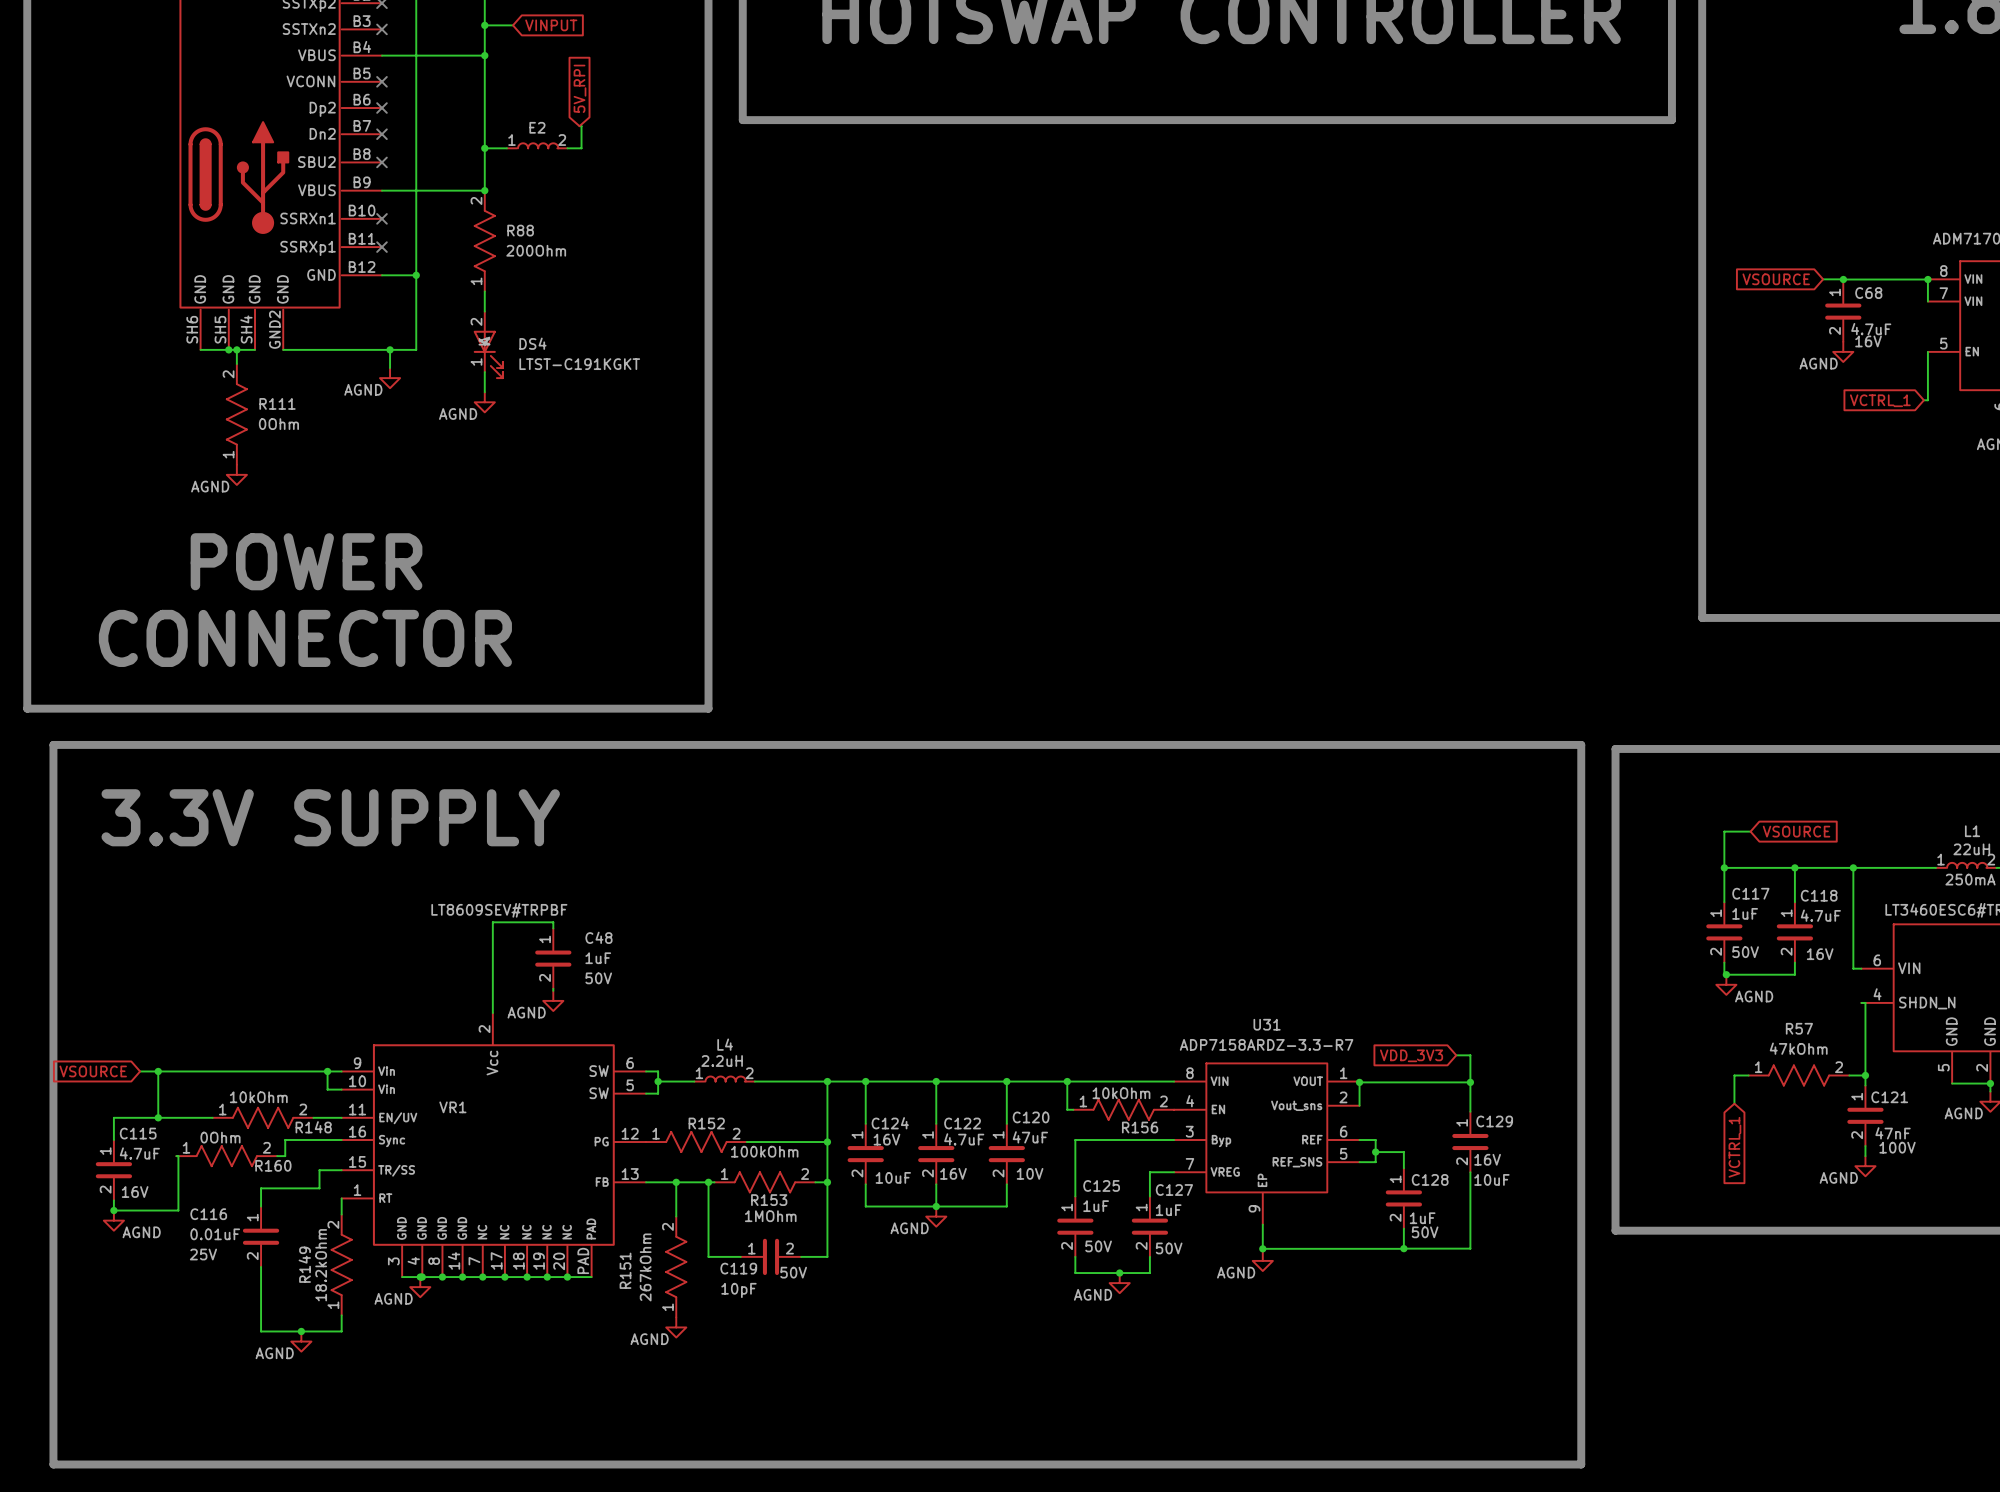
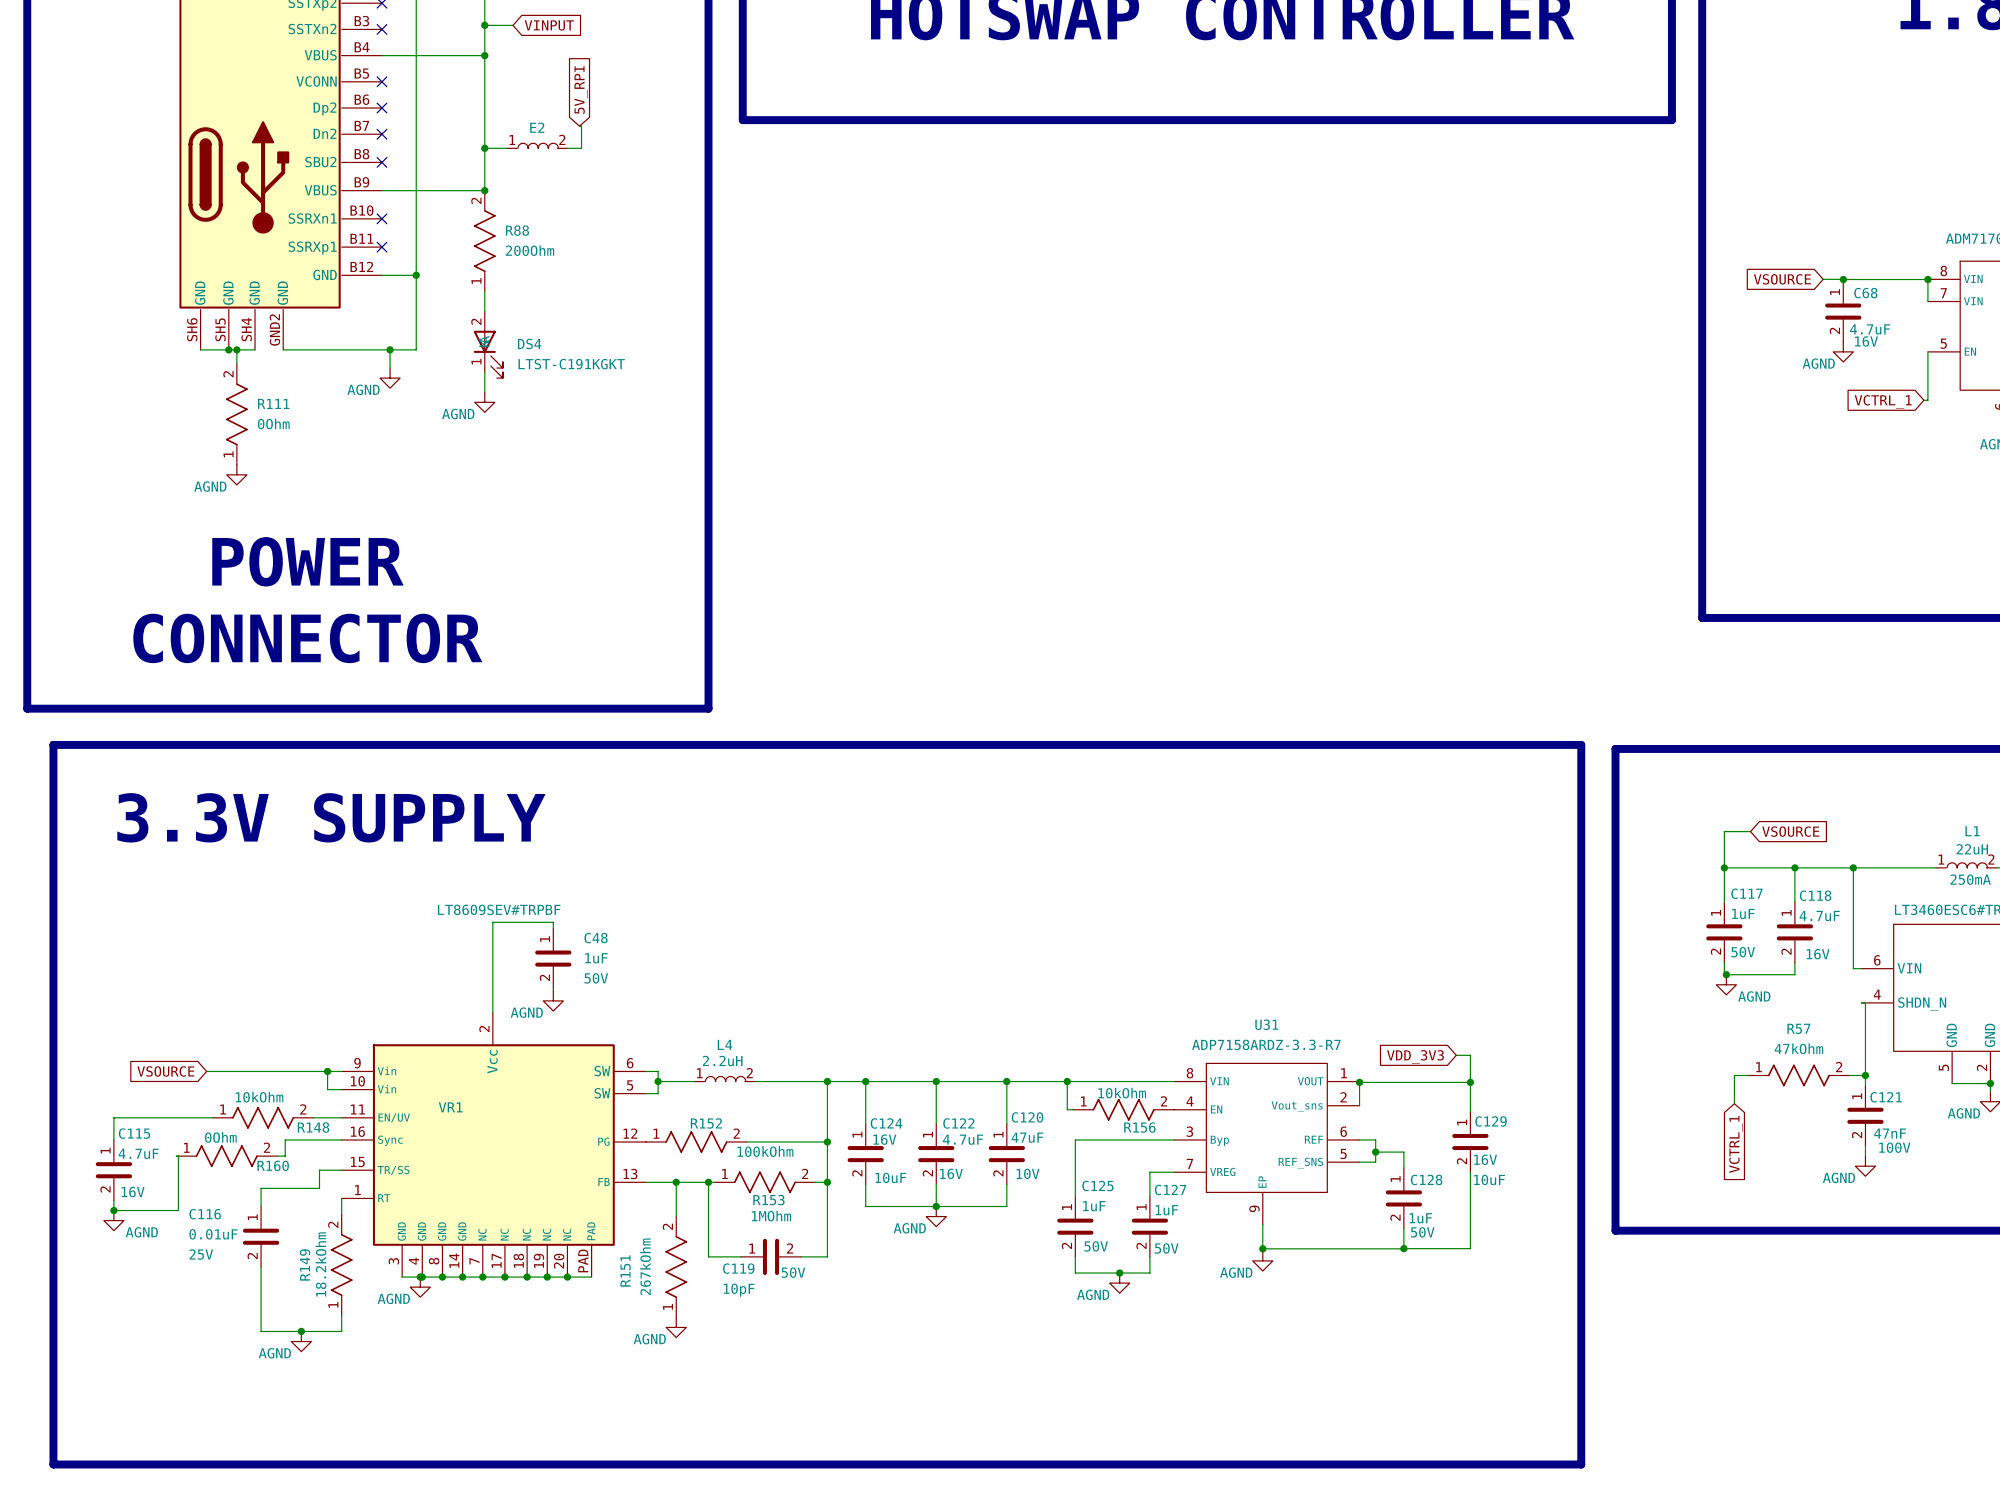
global label position: VSOURCE (93, 1071) -> VSOURCE (165, 1071)
wire: (140, 1071) (206, 1071) -> none
wire: (158, 1071) (158, 1117) -> none
junction: (158, 1071) -> none
junction: (158, 1117) -> none

